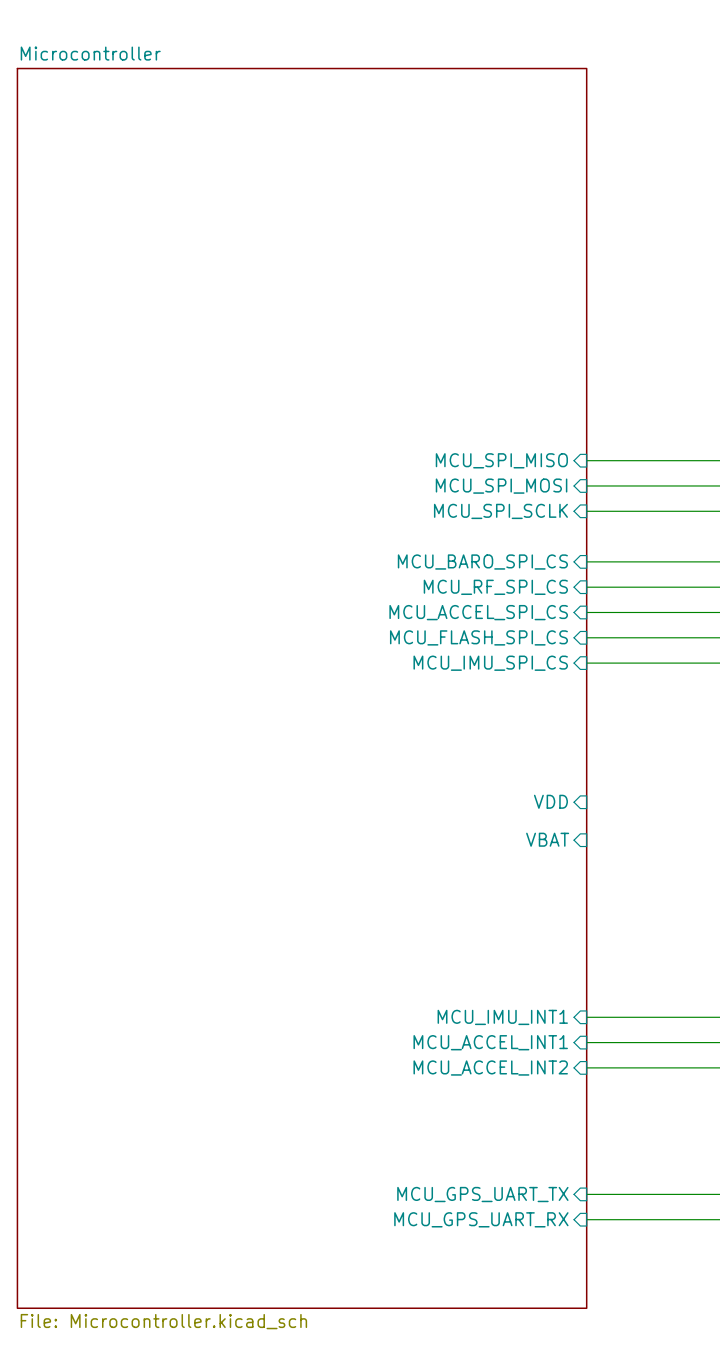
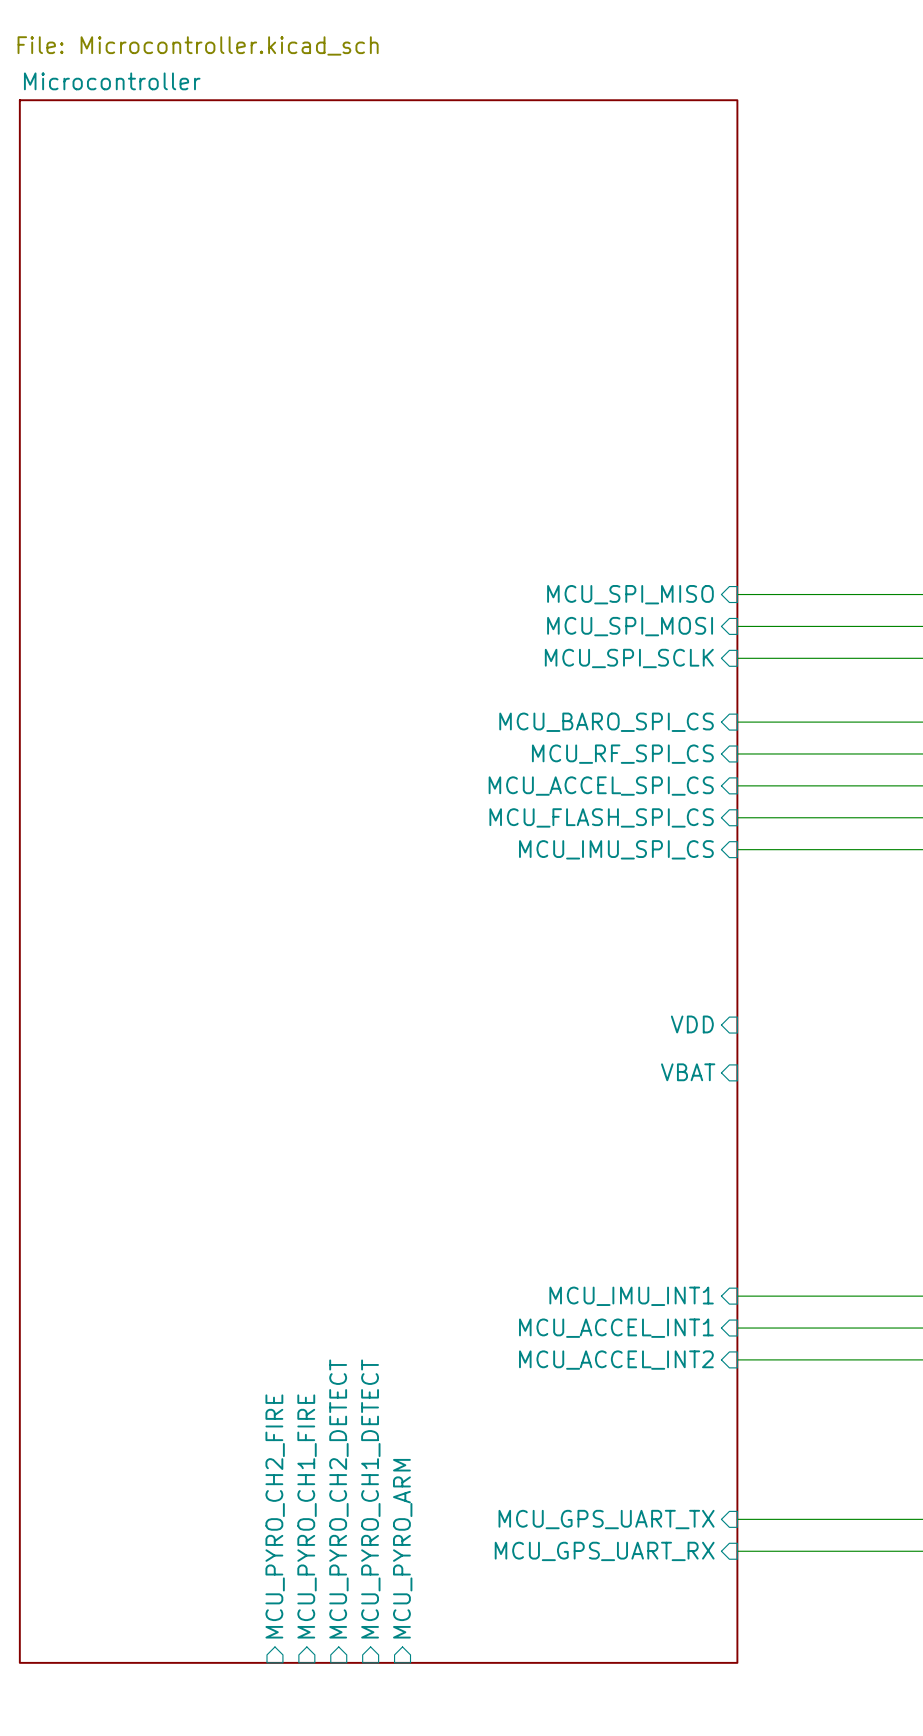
sheet pin: none -> MCU_PYRO_CH2_DETECT (338, 1498)
sheet pin: none -> MCU_PYRO_CH1_DETECT (370, 1498)
sheet pin: none -> MCU_PYRO_CH2_FIRE (275, 1516)
sheet pin: none -> MCU_PYRO_CH1_FIRE (307, 1516)
sheet pin: none -> MCU_PYRO_ARM (402, 1548)
sheet Microcontroller value position: File: Microcontroller.kicad_sch (163, 1321) -> File: Microcontroller.kicad_sch (198, 45)

